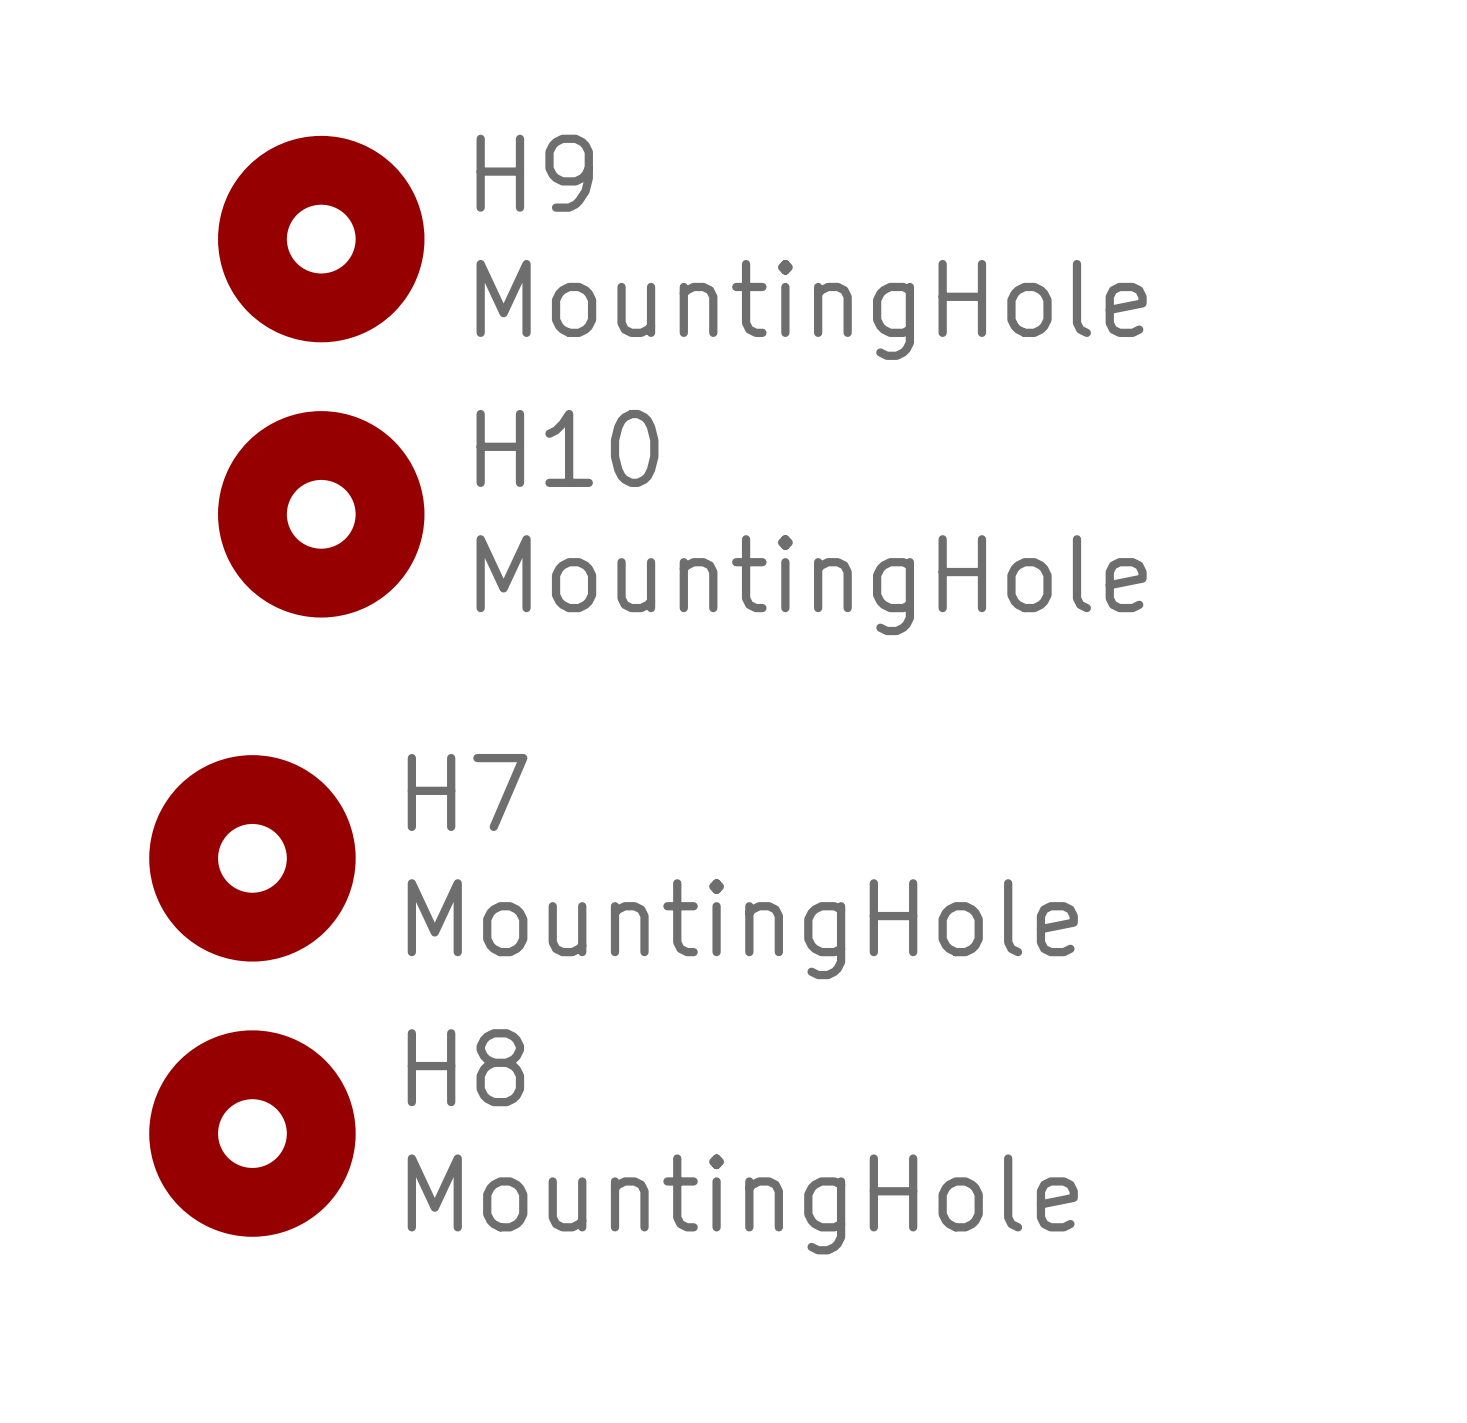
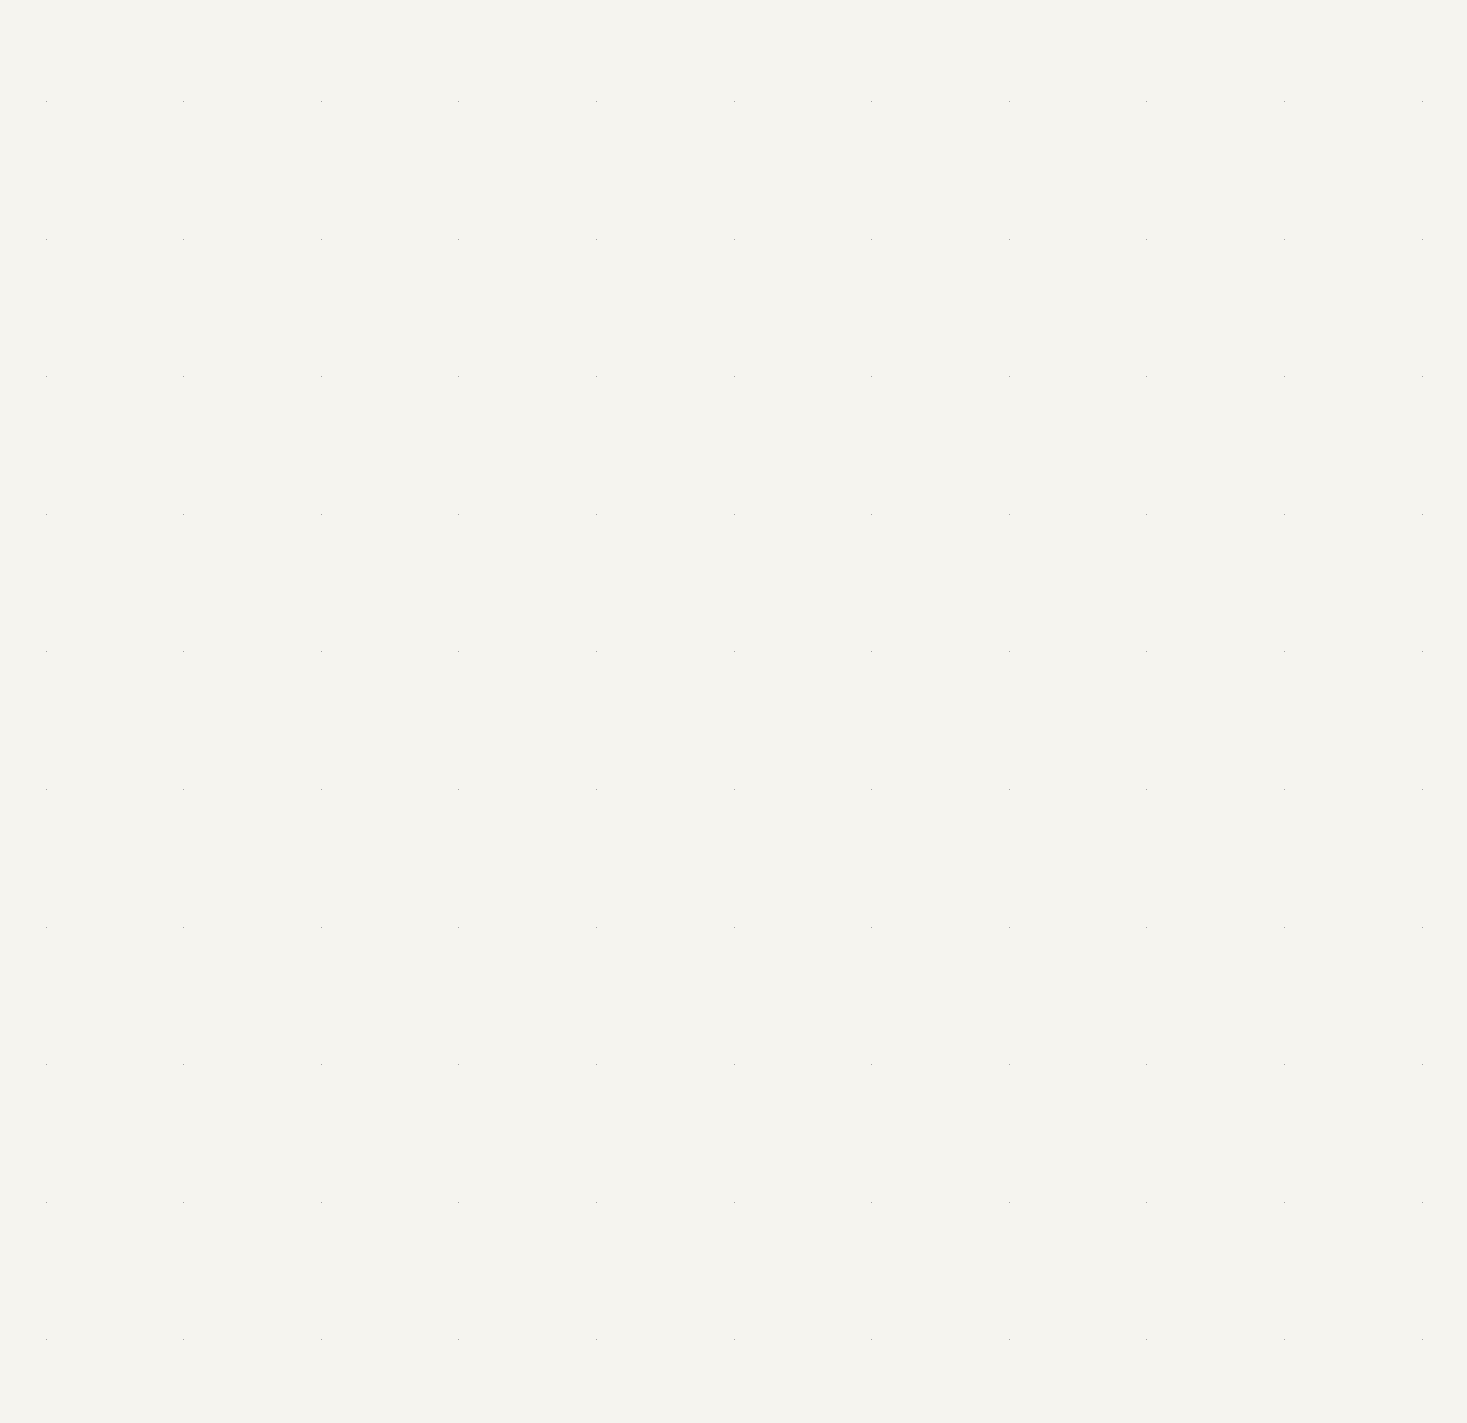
H9: MountingHole (321, 239) -> none
H10: MountingHole (321, 514) -> none
H7: MountingHole (252, 858) -> none
H8: MountingHole (252, 1133) -> none

